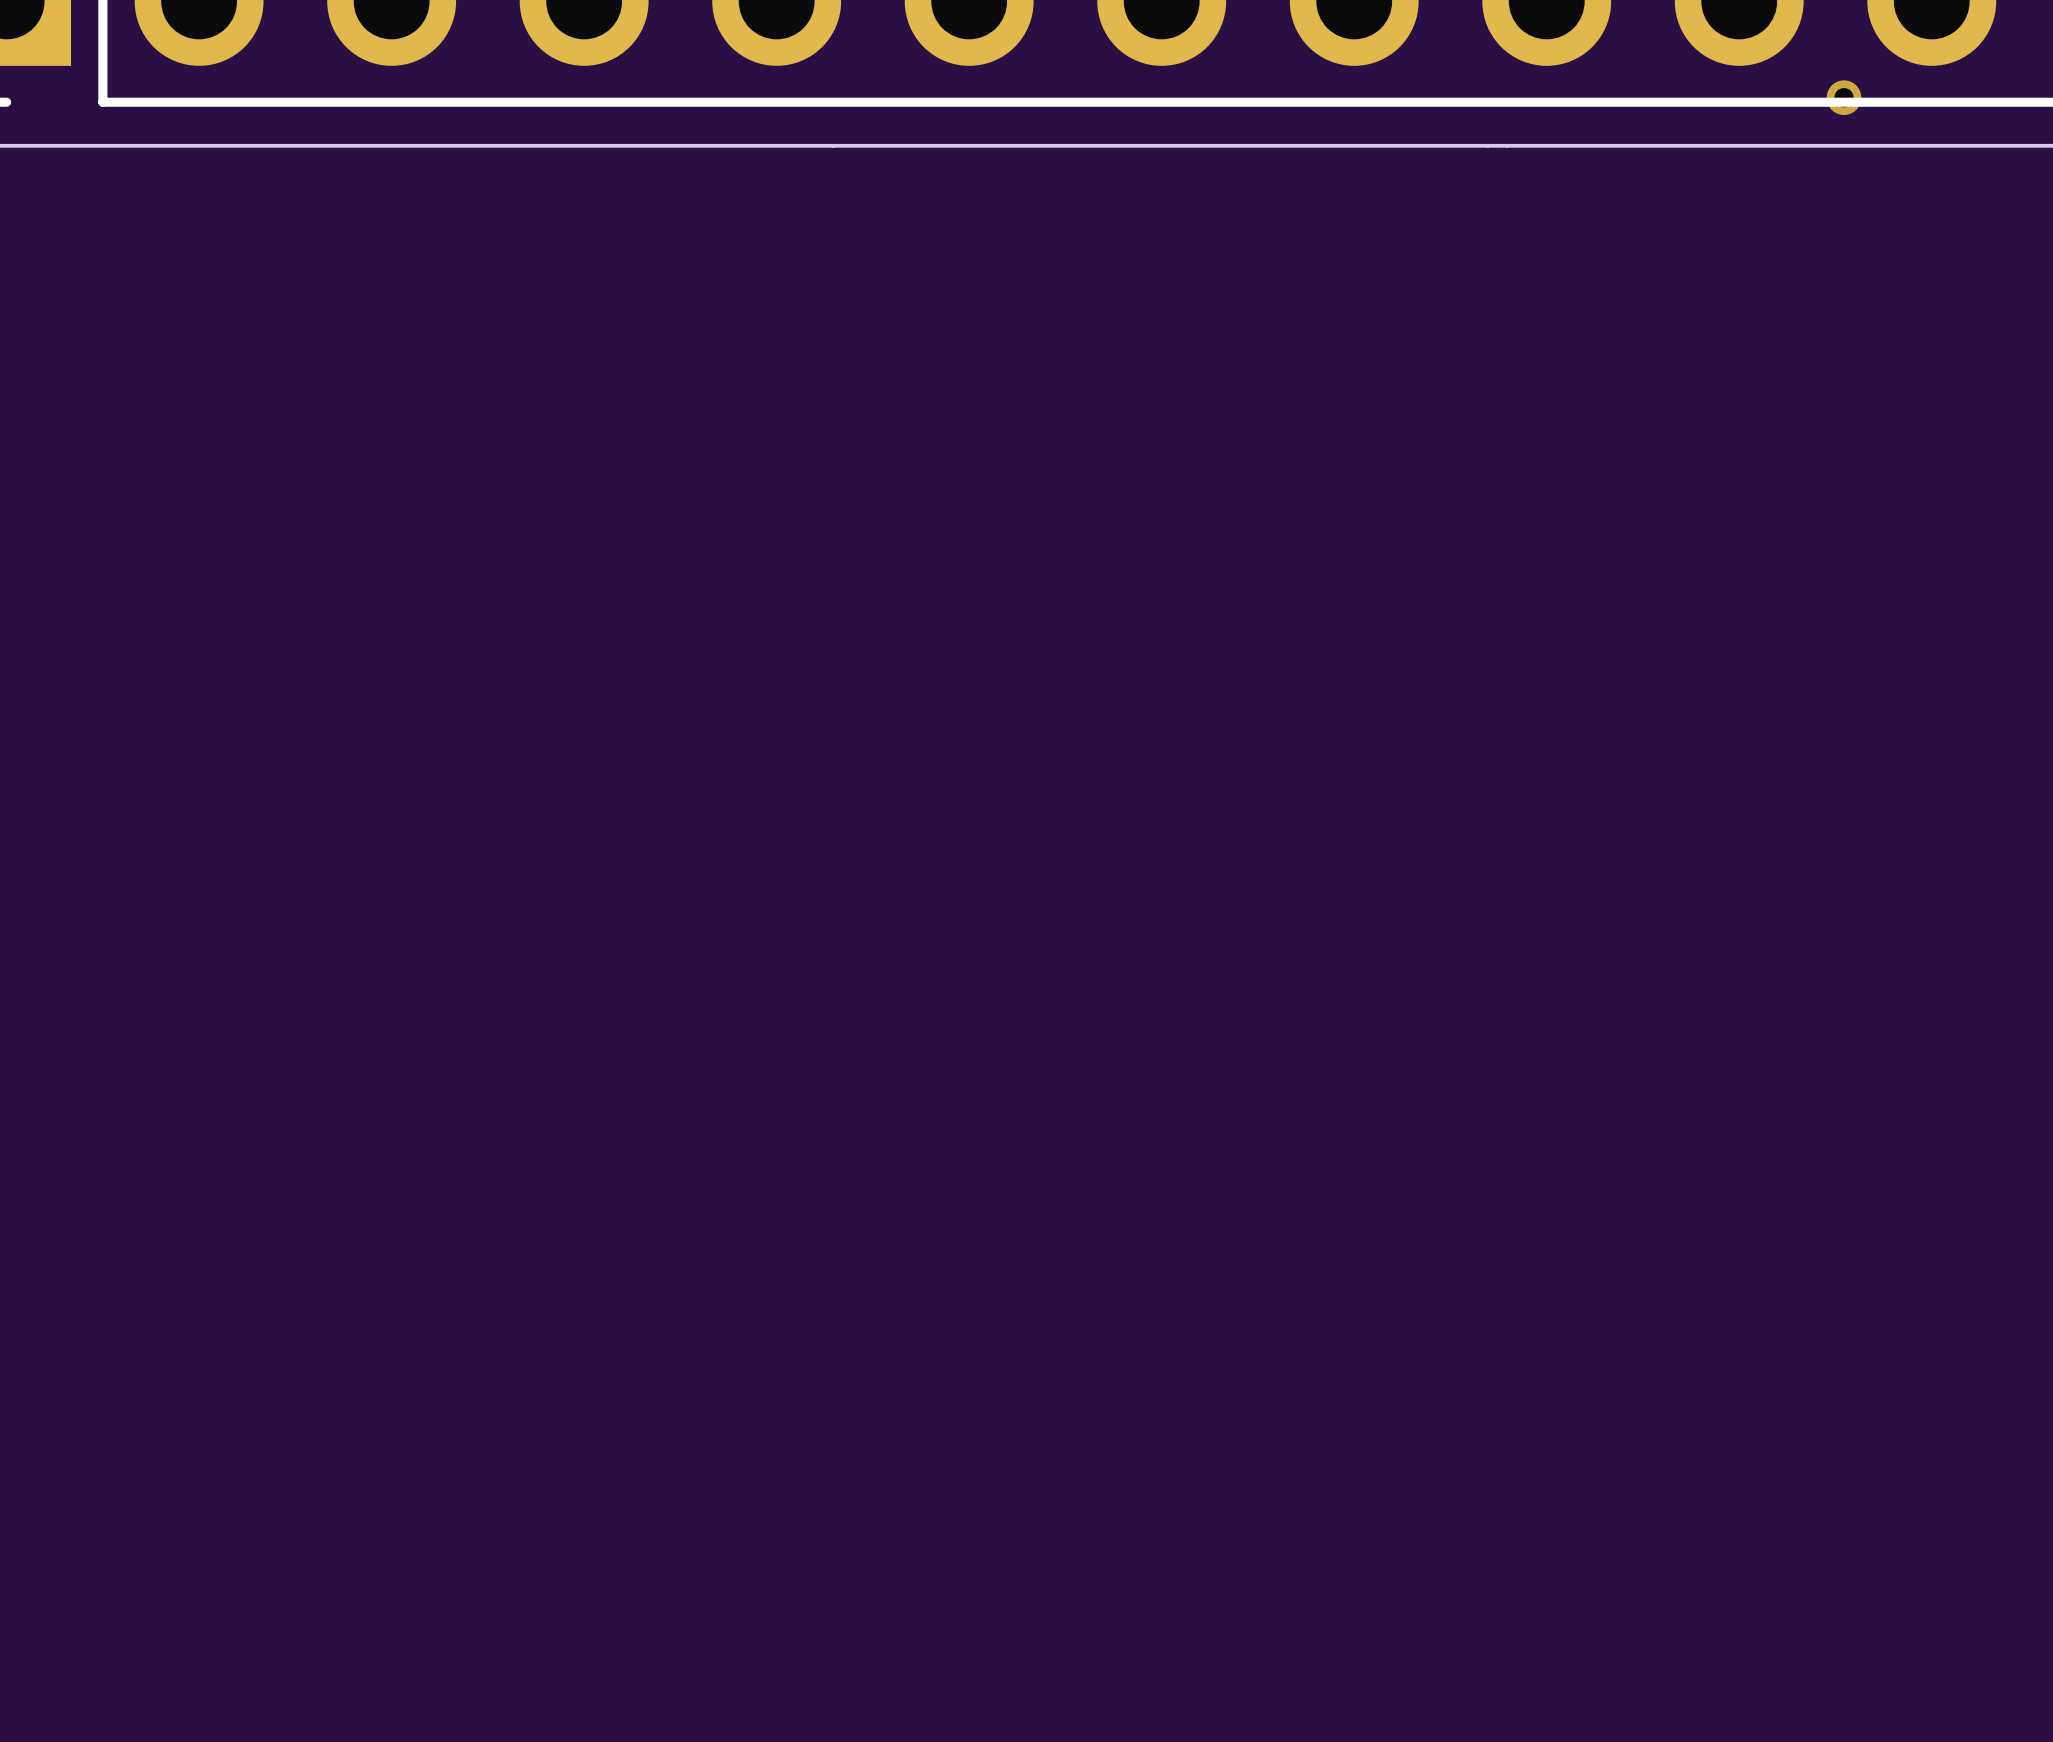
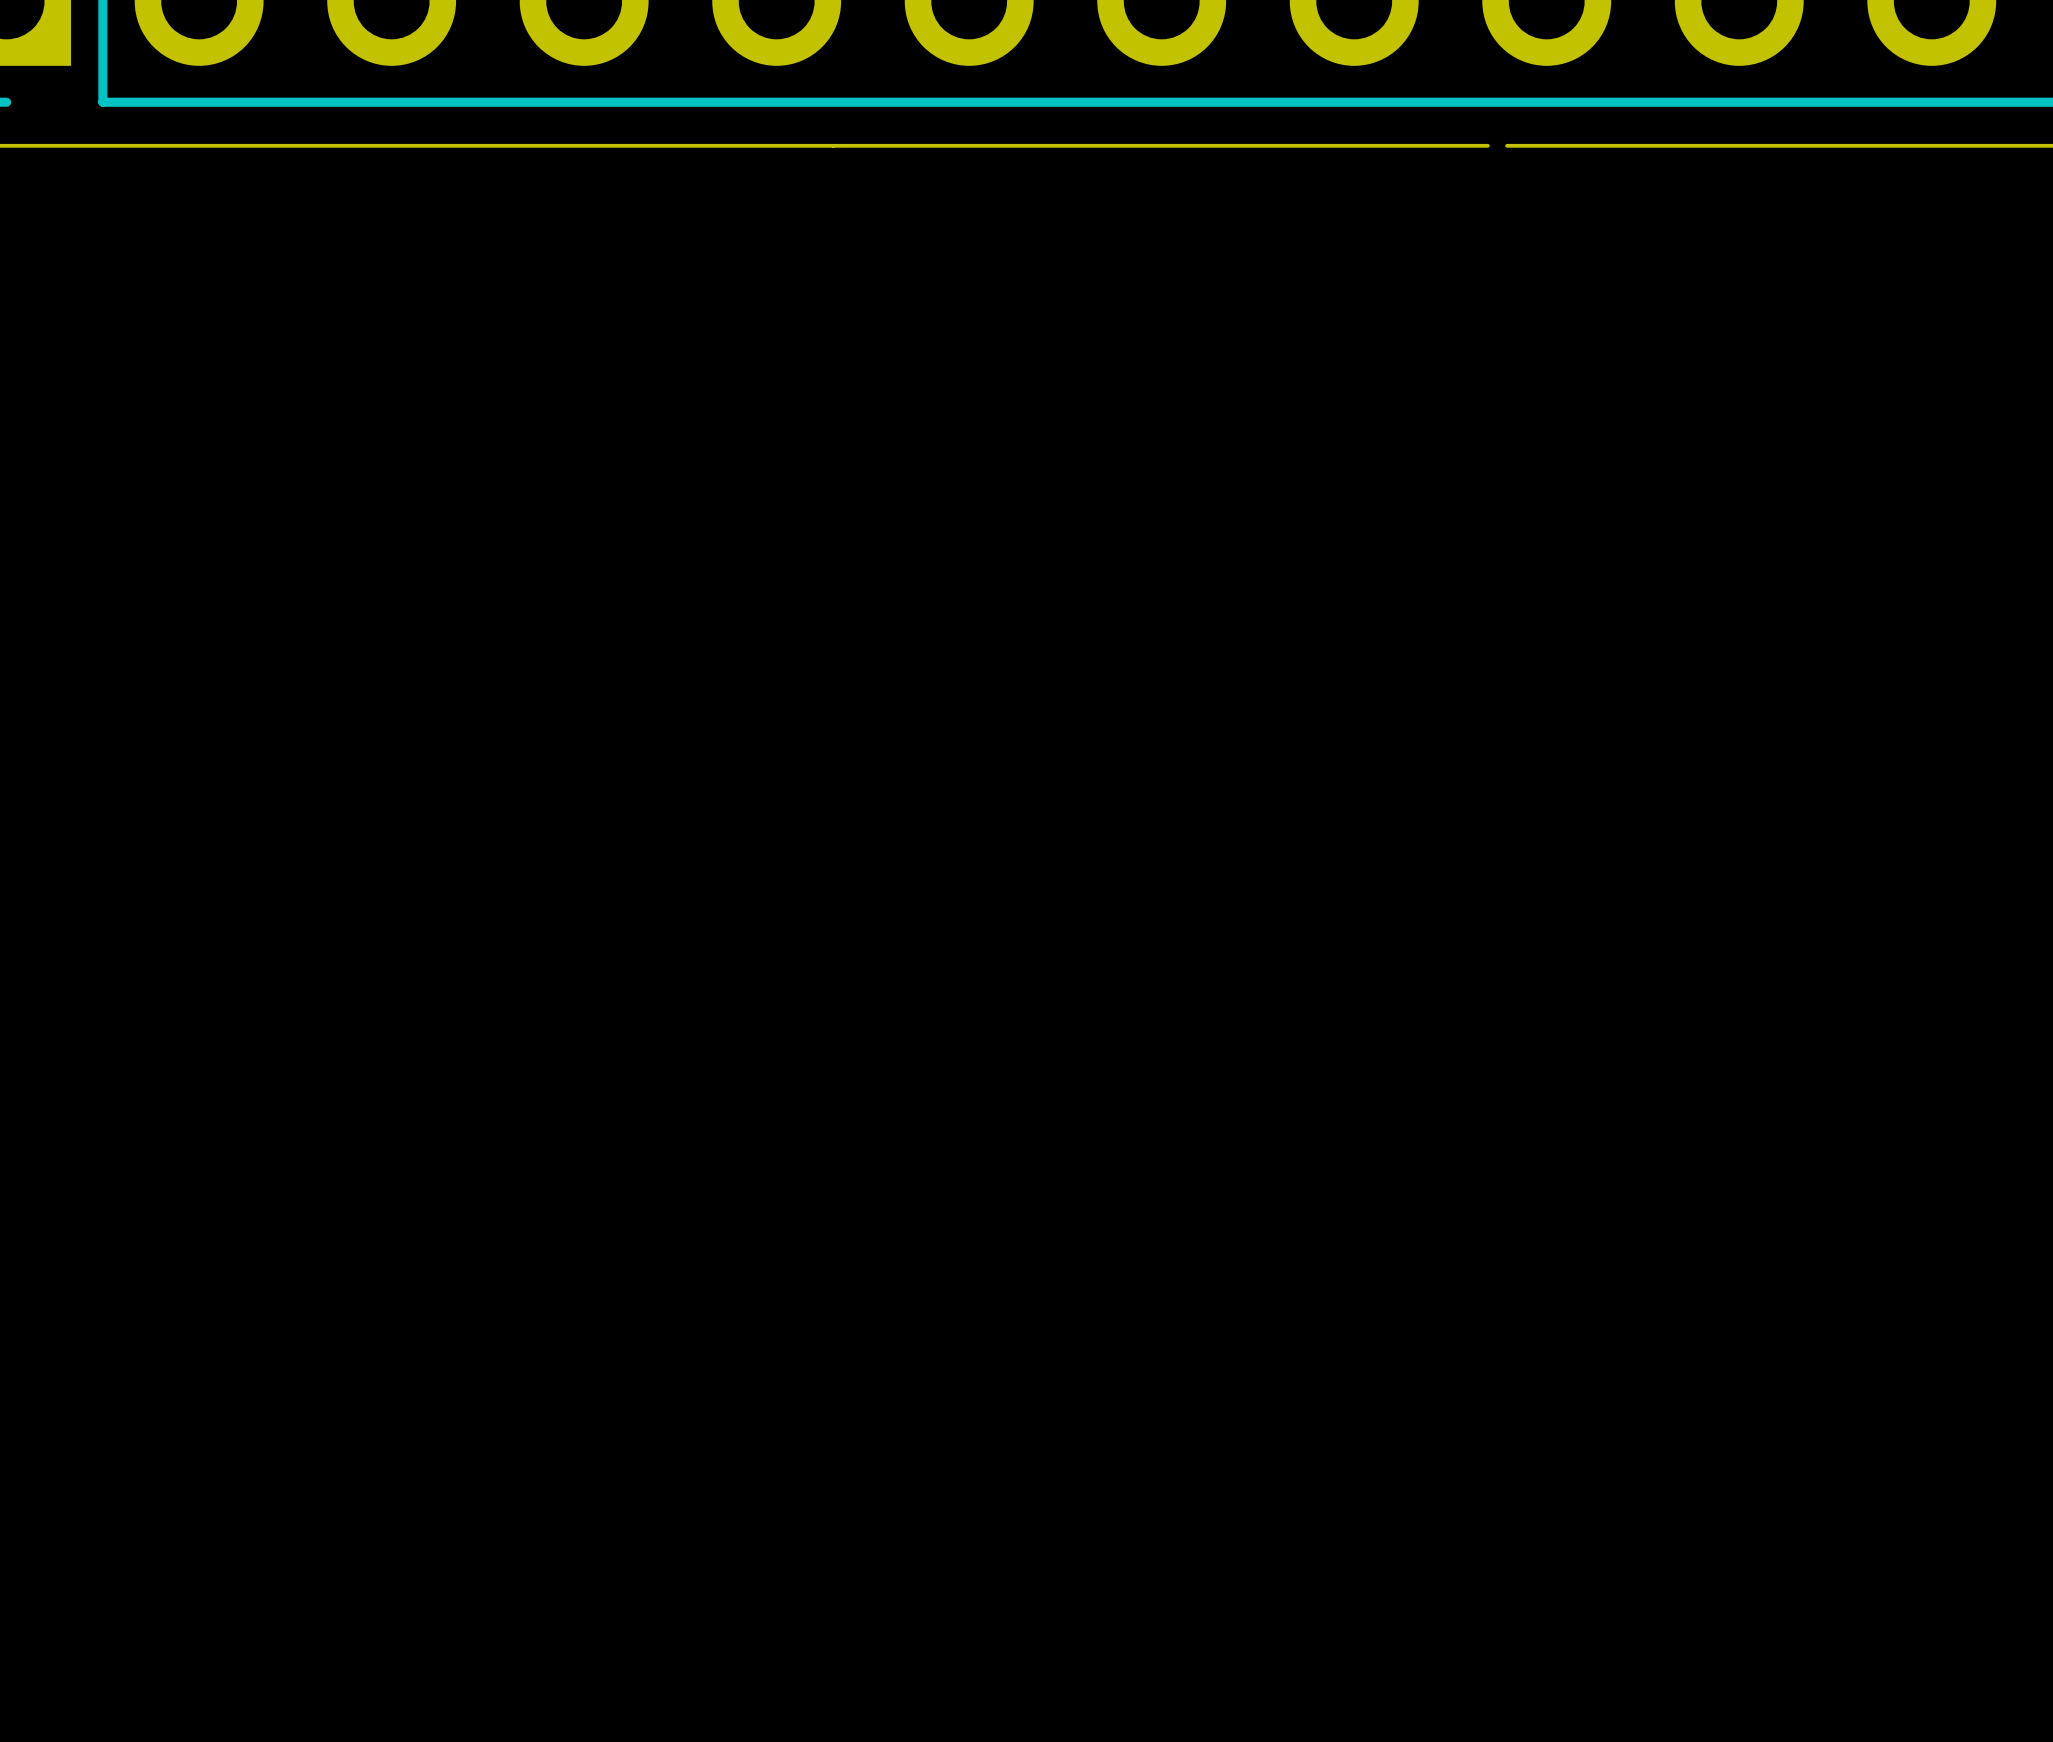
via: (1844, 97) -> none
board edge: (1487, 145) (1507, 145) -> none

